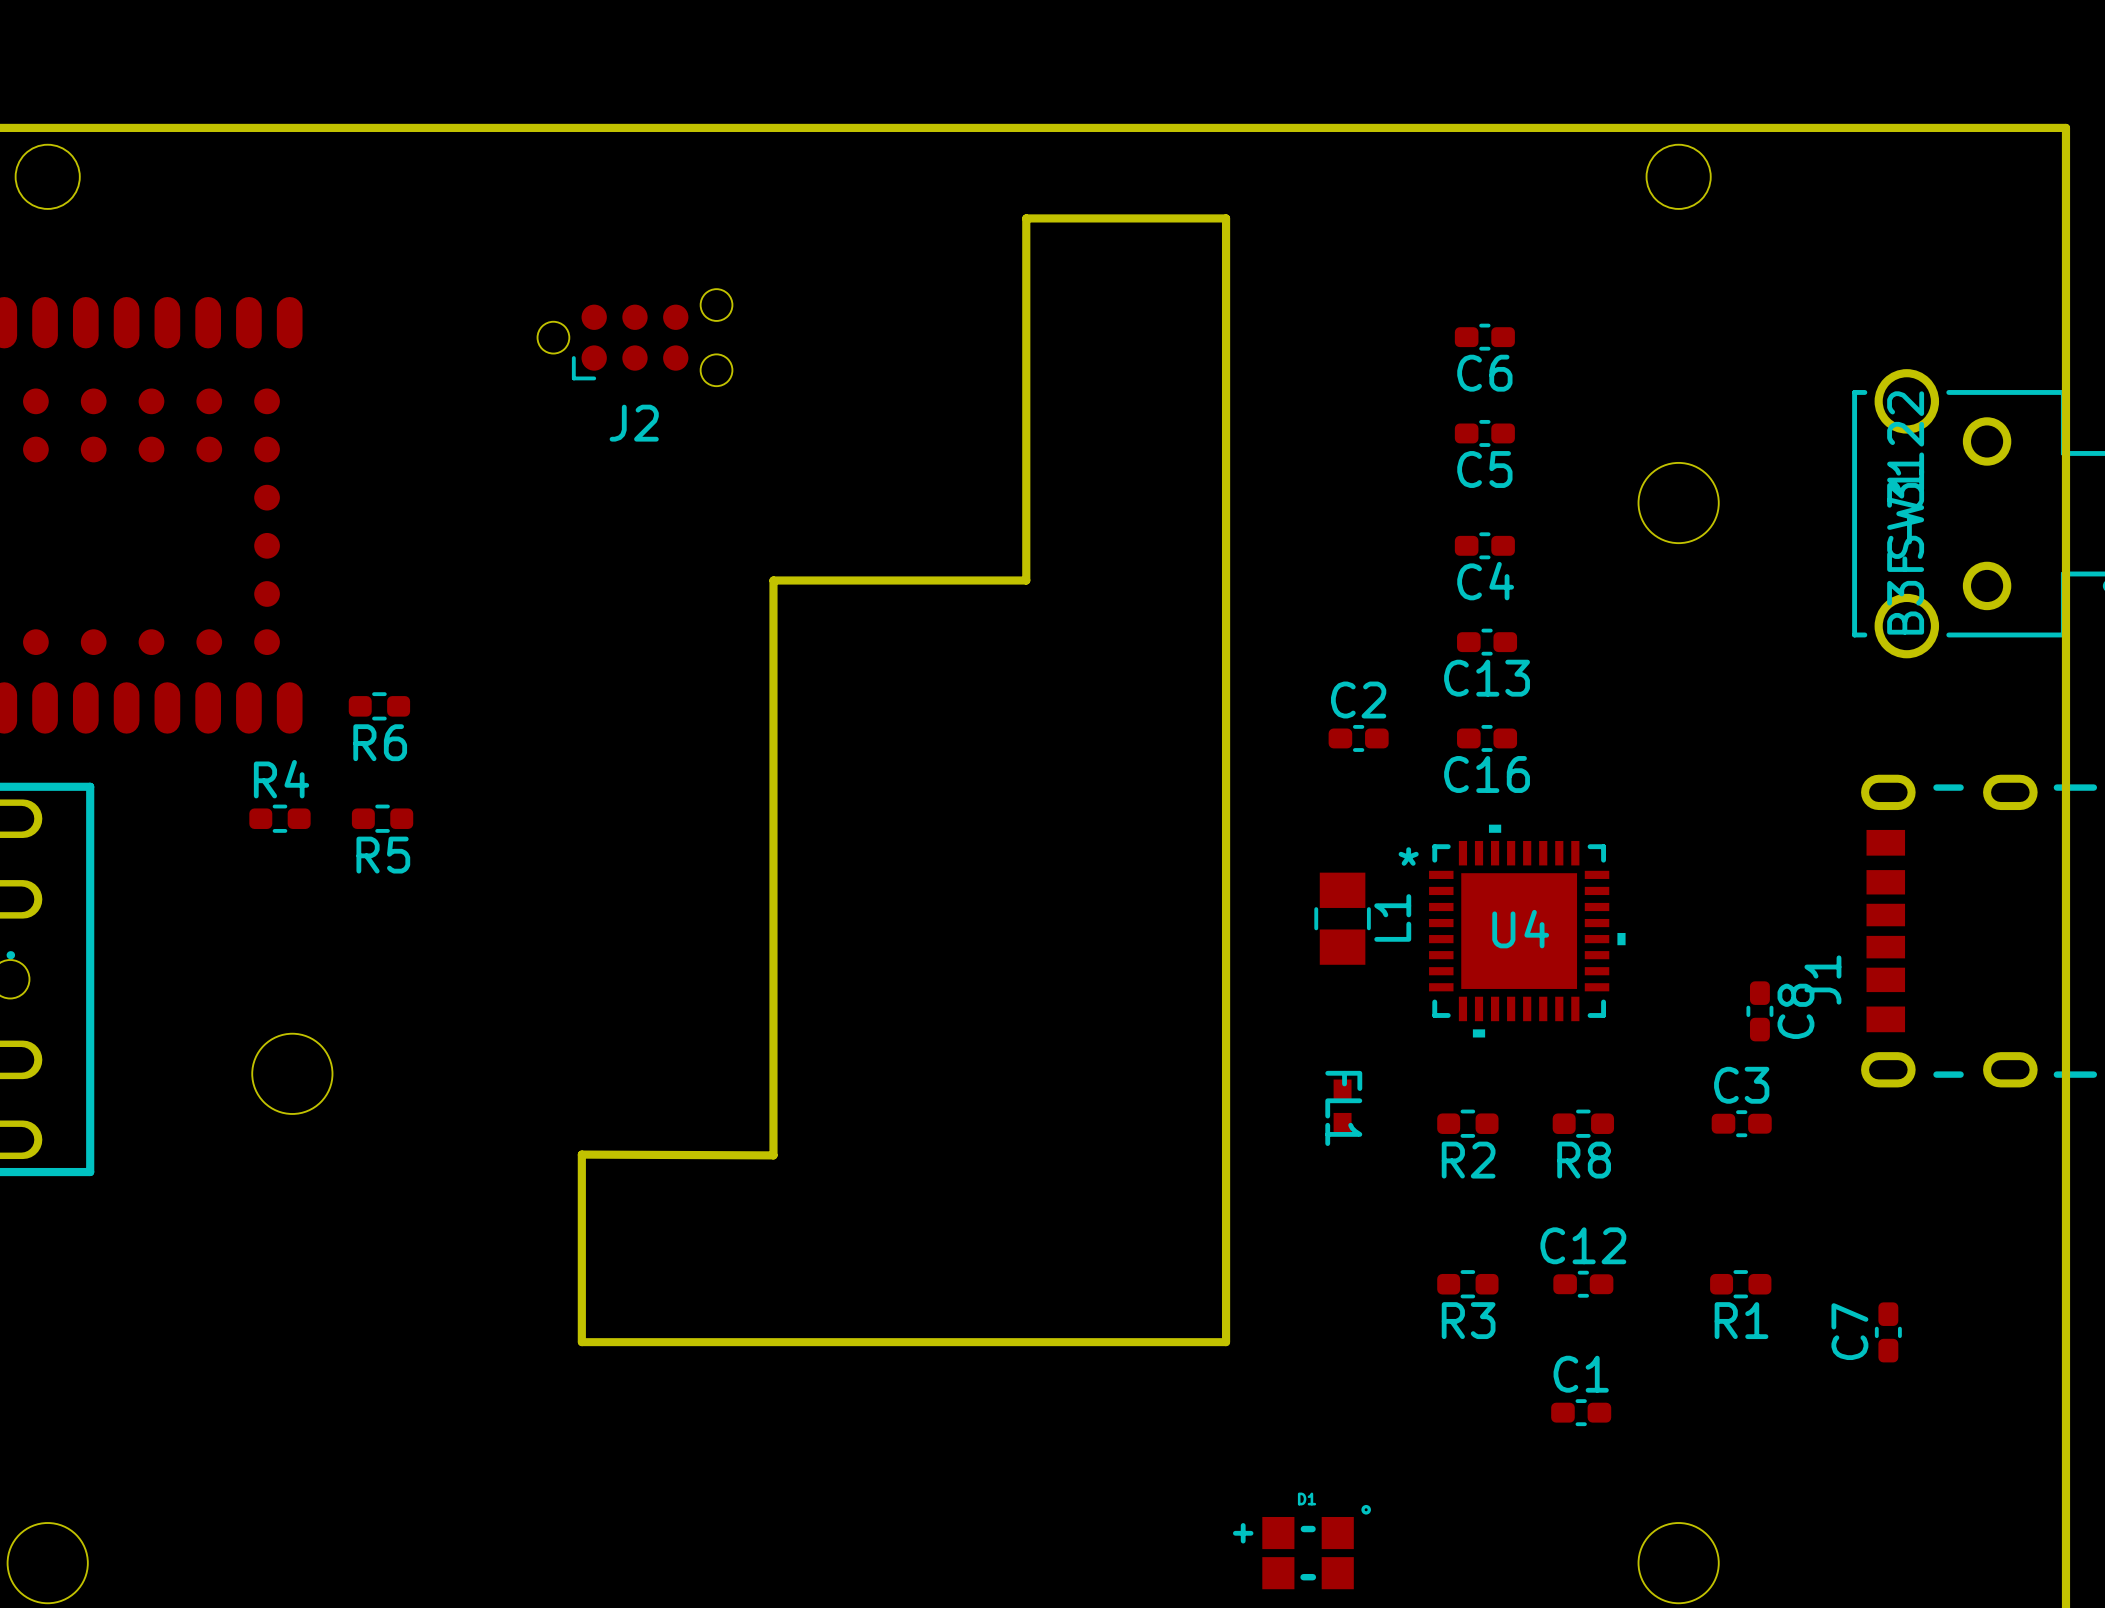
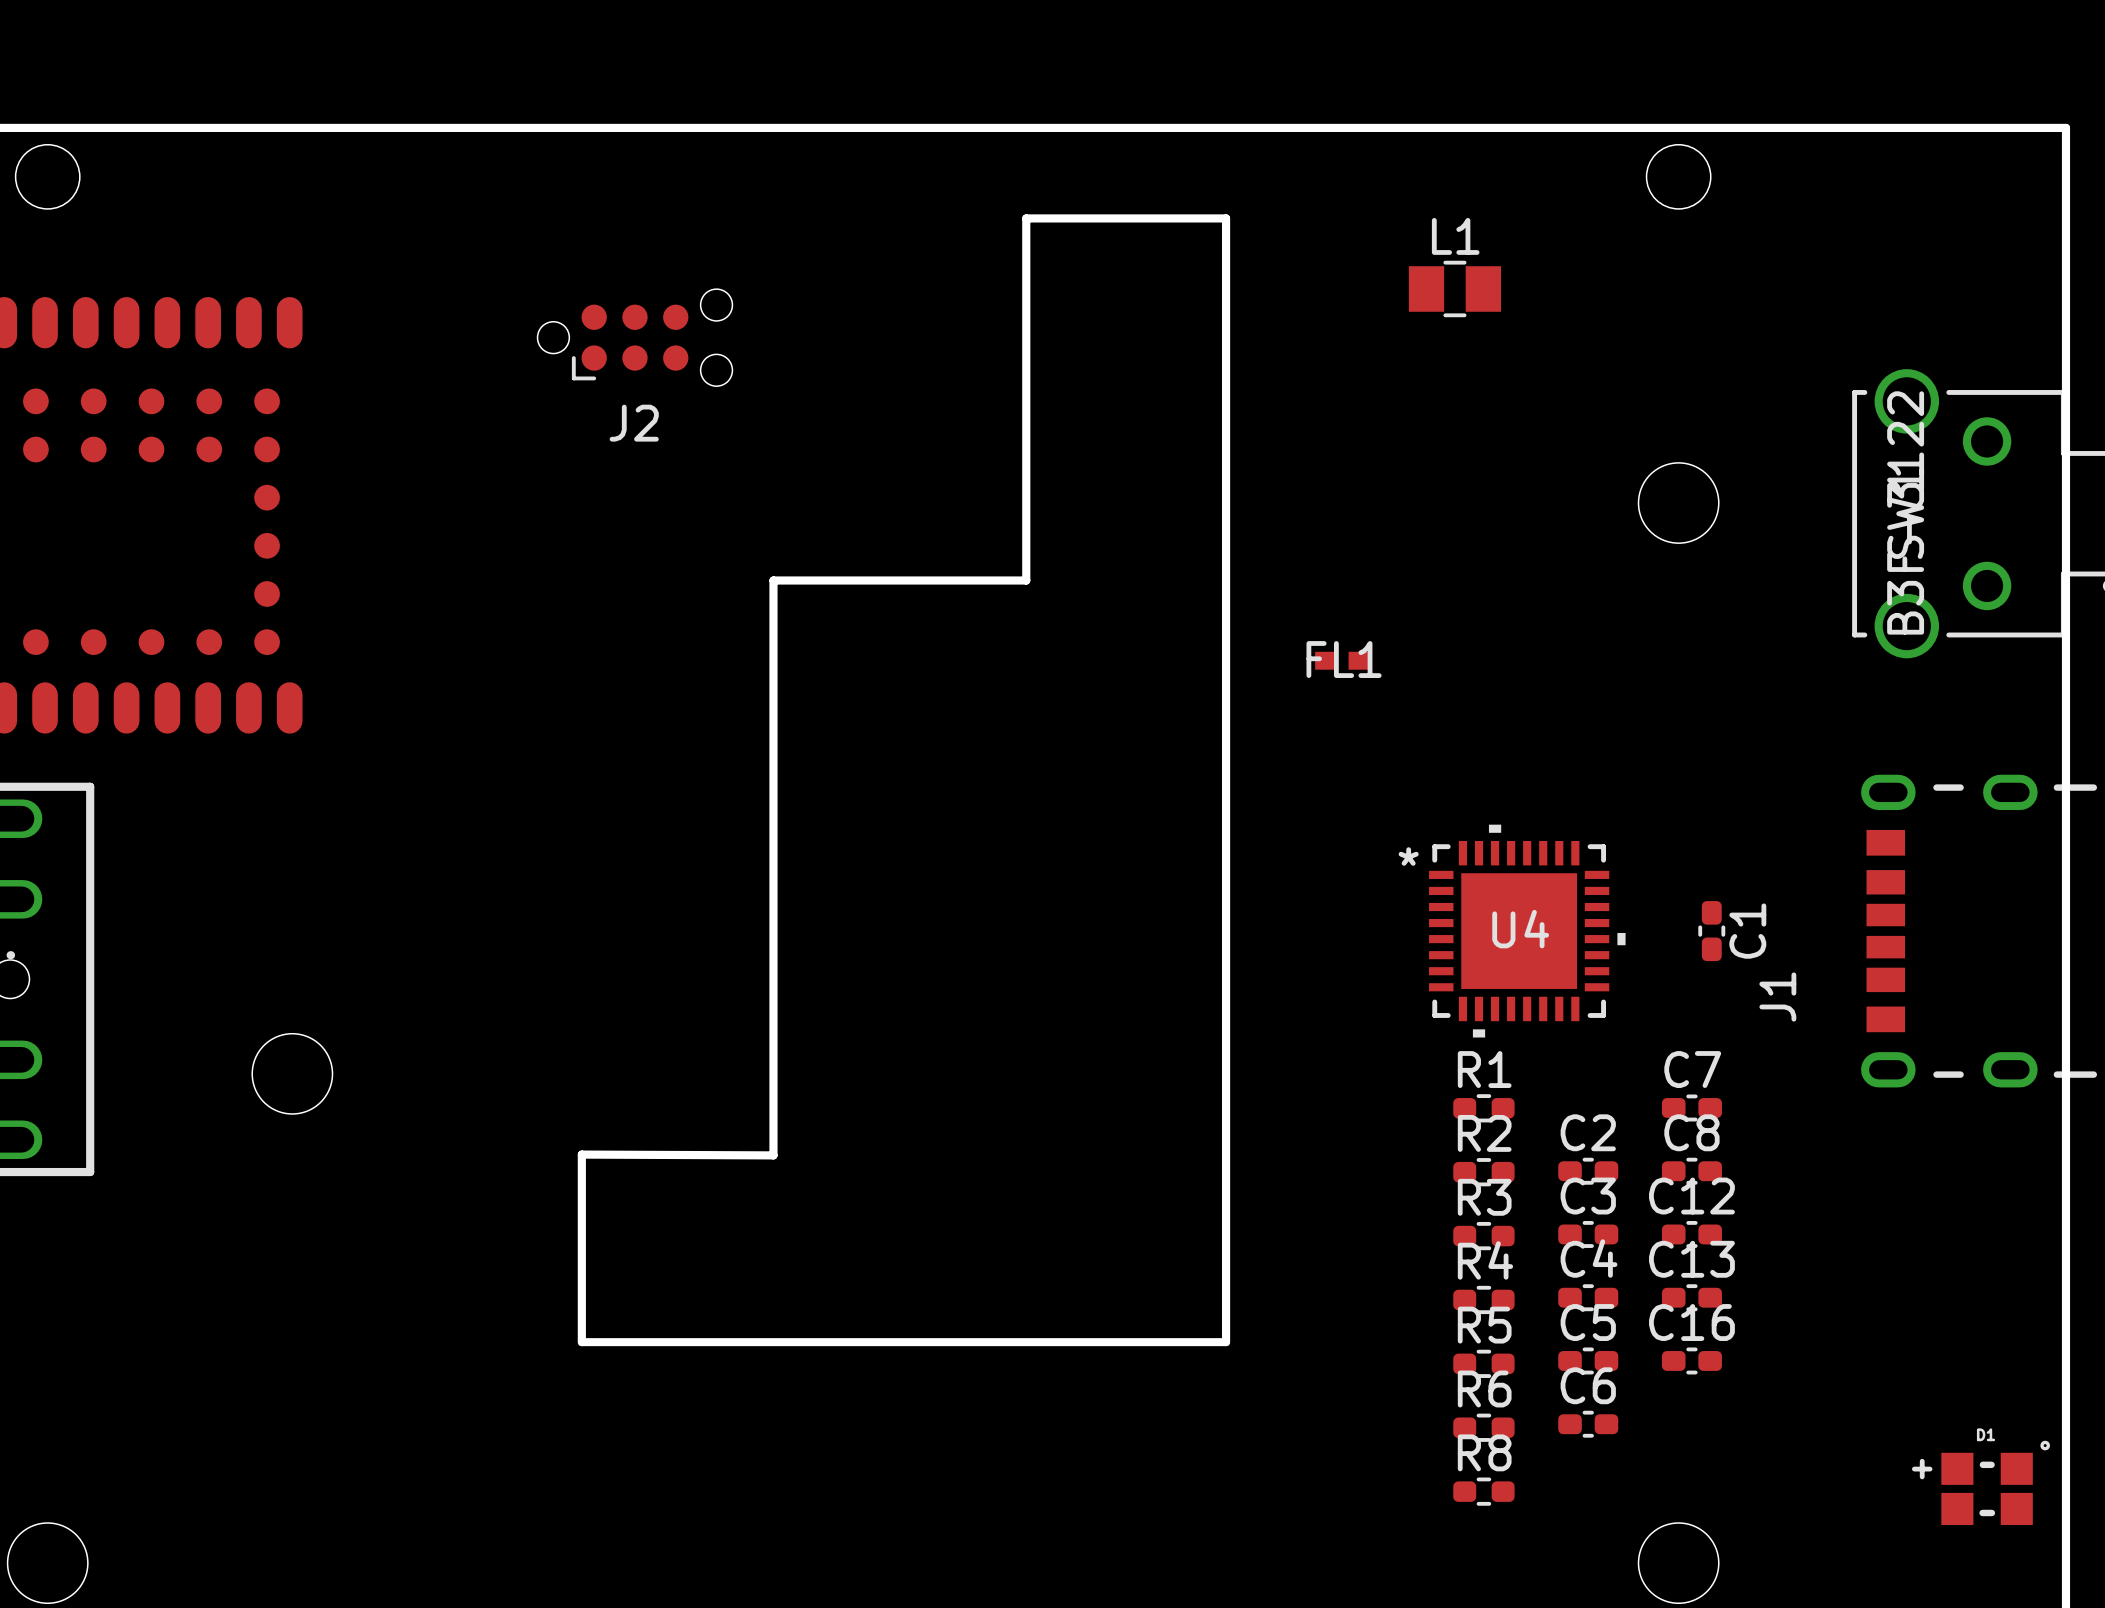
C6 position: (1484, 337) -> (1588, 1424)
C6 name position: C6 (1484, 373) -> C6 (1588, 1385)
C5 position: (1484, 433) -> (1588, 1360)
C5 name position: C5 (1484, 469) -> C5 (1588, 1322)
C4 position: (1484, 545) -> (1588, 1297)
C4 name position: C4 (1485, 581) -> C4 (1589, 1258)
C13 position: (1487, 642) -> (1691, 1297)
C13 name position: C13 (1487, 678) -> C13 (1691, 1259)
R6 position: (379, 706) -> (1483, 1427)
C2 position: (1358, 738) -> (1588, 1171)
C16 position: (1487, 738) -> (1691, 1360)
R6 name position: R6 (380, 742) -> R6 (1484, 1388)
C16 name position: C16 (1487, 774) -> C16 (1691, 1322)
R4 position: (279, 818) -> (1483, 1299)
R5 position: (382, 818) -> (1483, 1363)
R5 name position: R5 (383, 855) -> R5 (1484, 1325)
L1 name position: L1 (1392, 917) -> L1 (1455, 236)
L1 rotation: 0° (1342, 918) -> 90° clockwise (1454, 288)
L1 position: (1342, 918) -> (1454, 288)
J1 name position: J1 (1822, 980) -> J1 (1777, 997)
C8 rotation: 0° (1759, 1011) -> 90° clockwise (1691, 1171)
C8 position: (1759, 1011) -> (1691, 1171)
FL1 rotation: 0° (1342, 1107) -> 90° clockwise (1343, 660)
FL1 position: (1342, 1107) -> (1343, 660)
R2 position: (1467, 1123) -> (1483, 1172)
R8 position: (1583, 1123) -> (1483, 1491)
C3 position: (1741, 1123) -> (1588, 1234)
R2 name position: R2 (1468, 1160) -> R2 (1484, 1133)
R8 name position: R8 (1584, 1160) -> R8 (1484, 1452)
R3 position: (1467, 1284) -> (1483, 1236)
C12 position: (1583, 1284) -> (1691, 1234)
R1 position: (1740, 1284) -> (1483, 1108)
R3 name position: R3 (1468, 1320) -> R3 (1484, 1197)
R1 name position: R1 (1741, 1320) -> R1 (1484, 1069)
C7 rotation: 0° (1888, 1332) -> 90° clockwise (1691, 1107)
C7 position: (1888, 1332) -> (1691, 1107)
C1 rotation: 0° (1581, 1412) -> 90° clockwise (1711, 931)
C1 position: (1581, 1412) -> (1711, 931)
D1 position: (1316, 1547) -> (1995, 1482)

